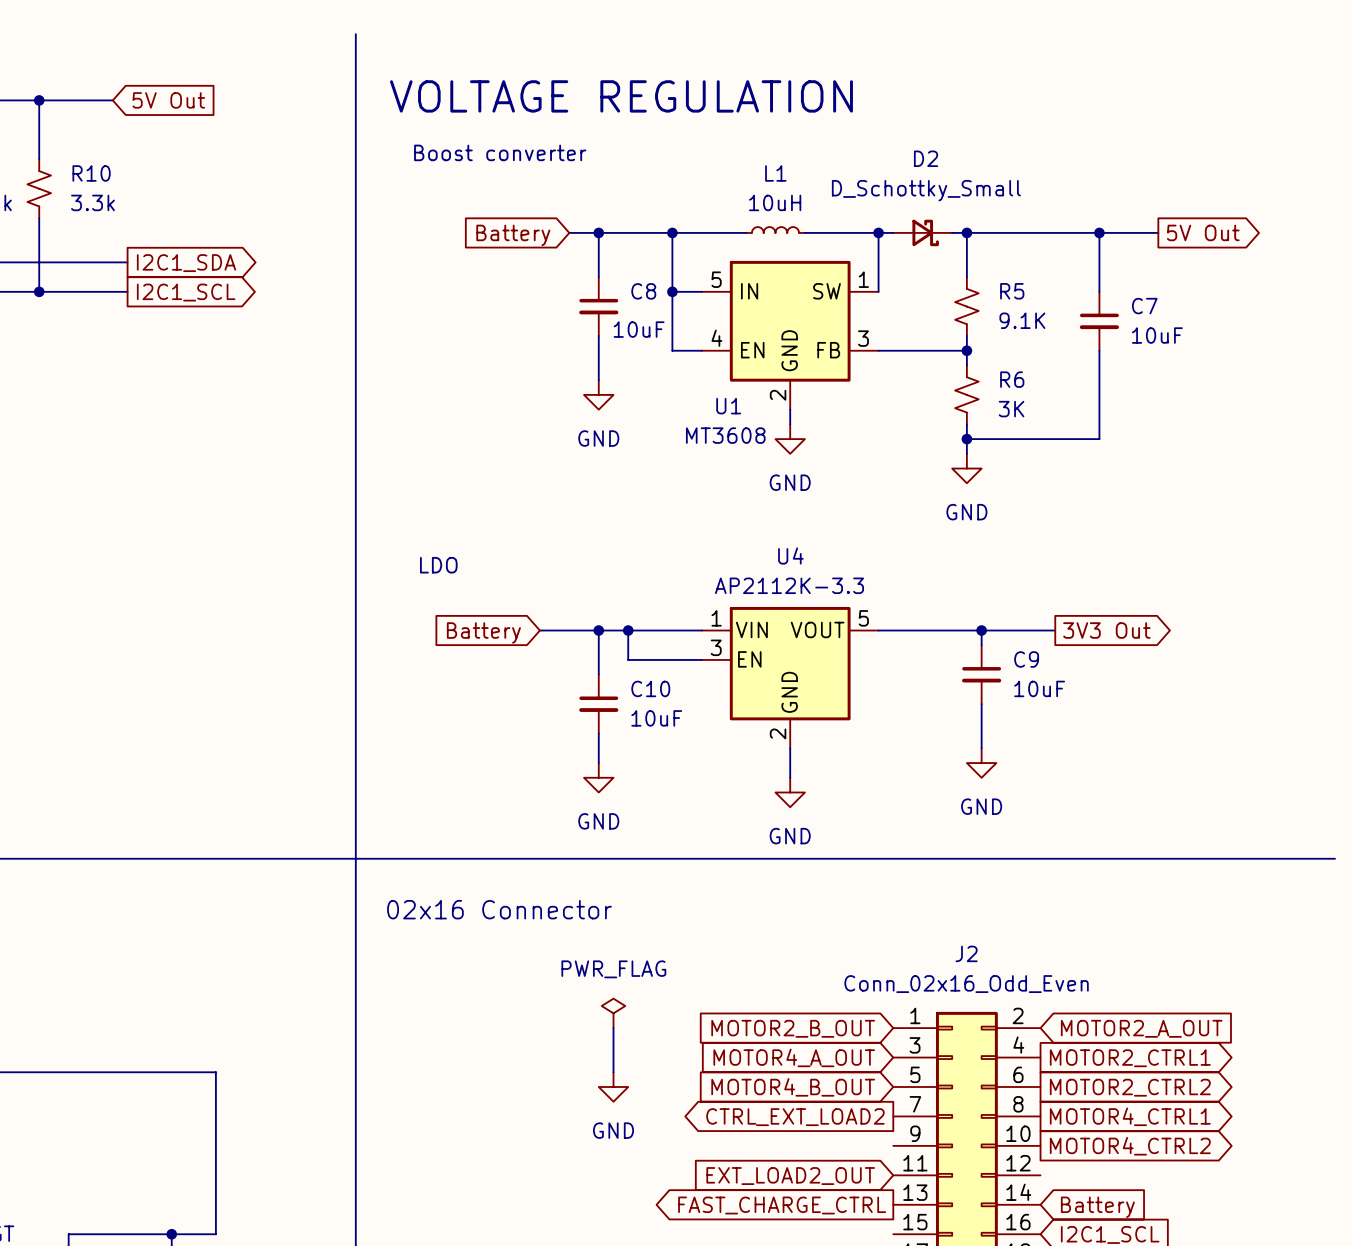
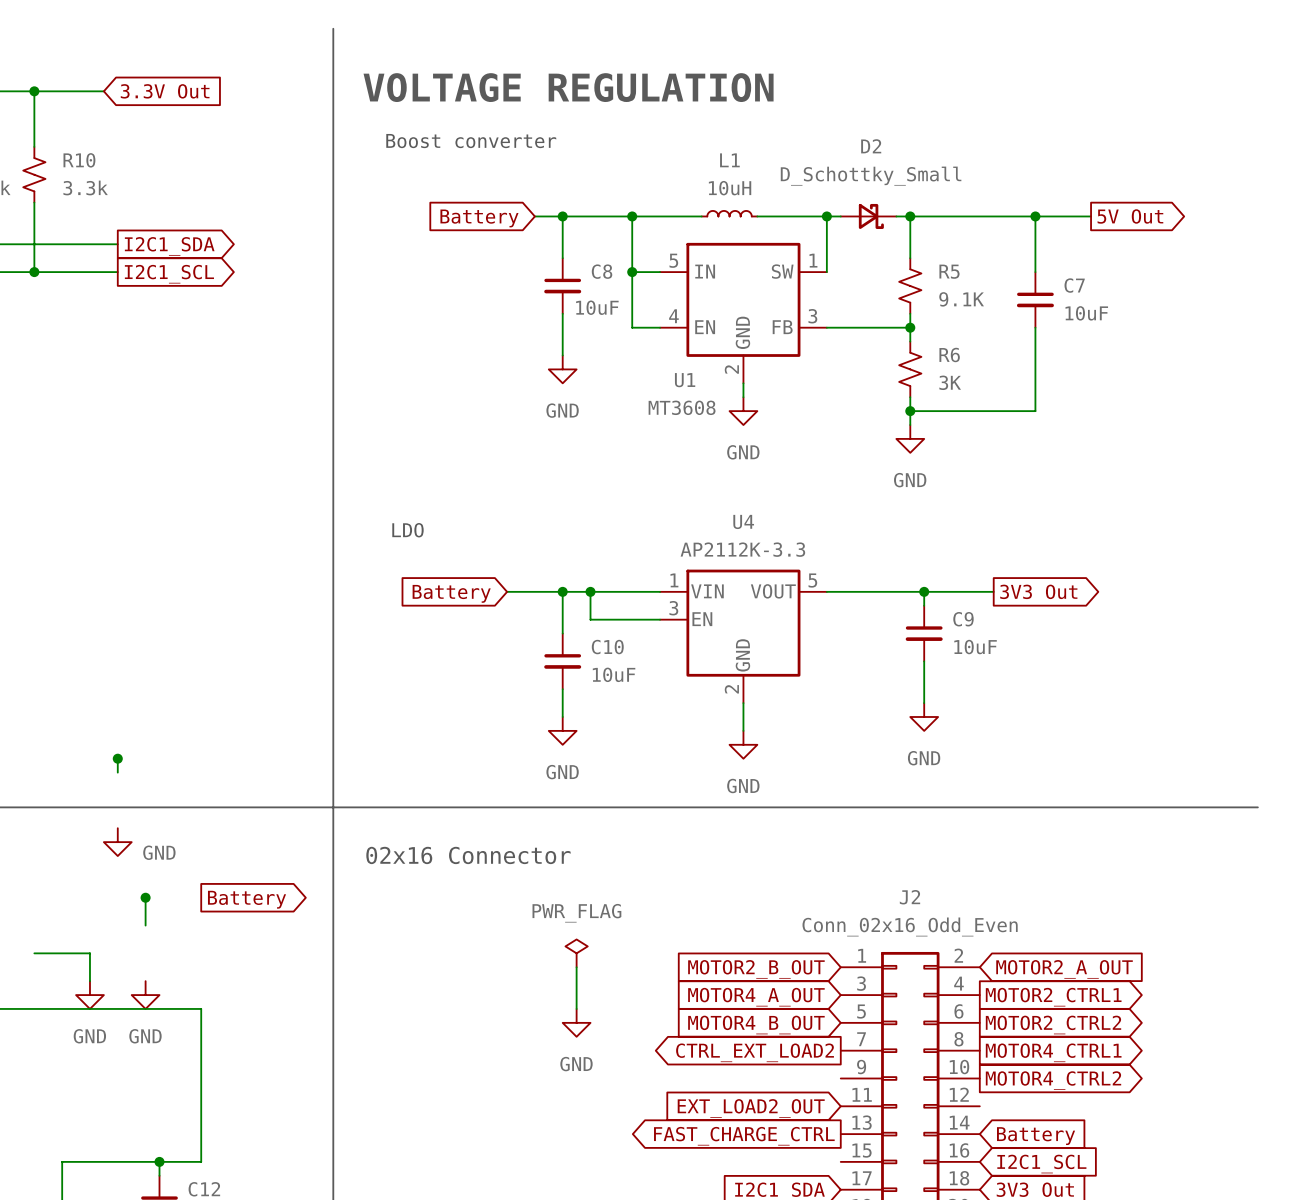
global label: 5V Out (168, 100) -> 3.3V Out (165, 91)
wire: none -> (117, 758) (117, 772)
junction: none -> (117, 758)
power symbol: none -> GND (117, 842)
wire: none -> (145, 897) (145, 925)
junction: none -> (145, 897)
global label: none -> Battery (247, 899)
wire: none -> (34, 953) (89, 953) (89, 981)
power symbol: none -> GND (89, 995)
power symbol: none -> GND (145, 995)

